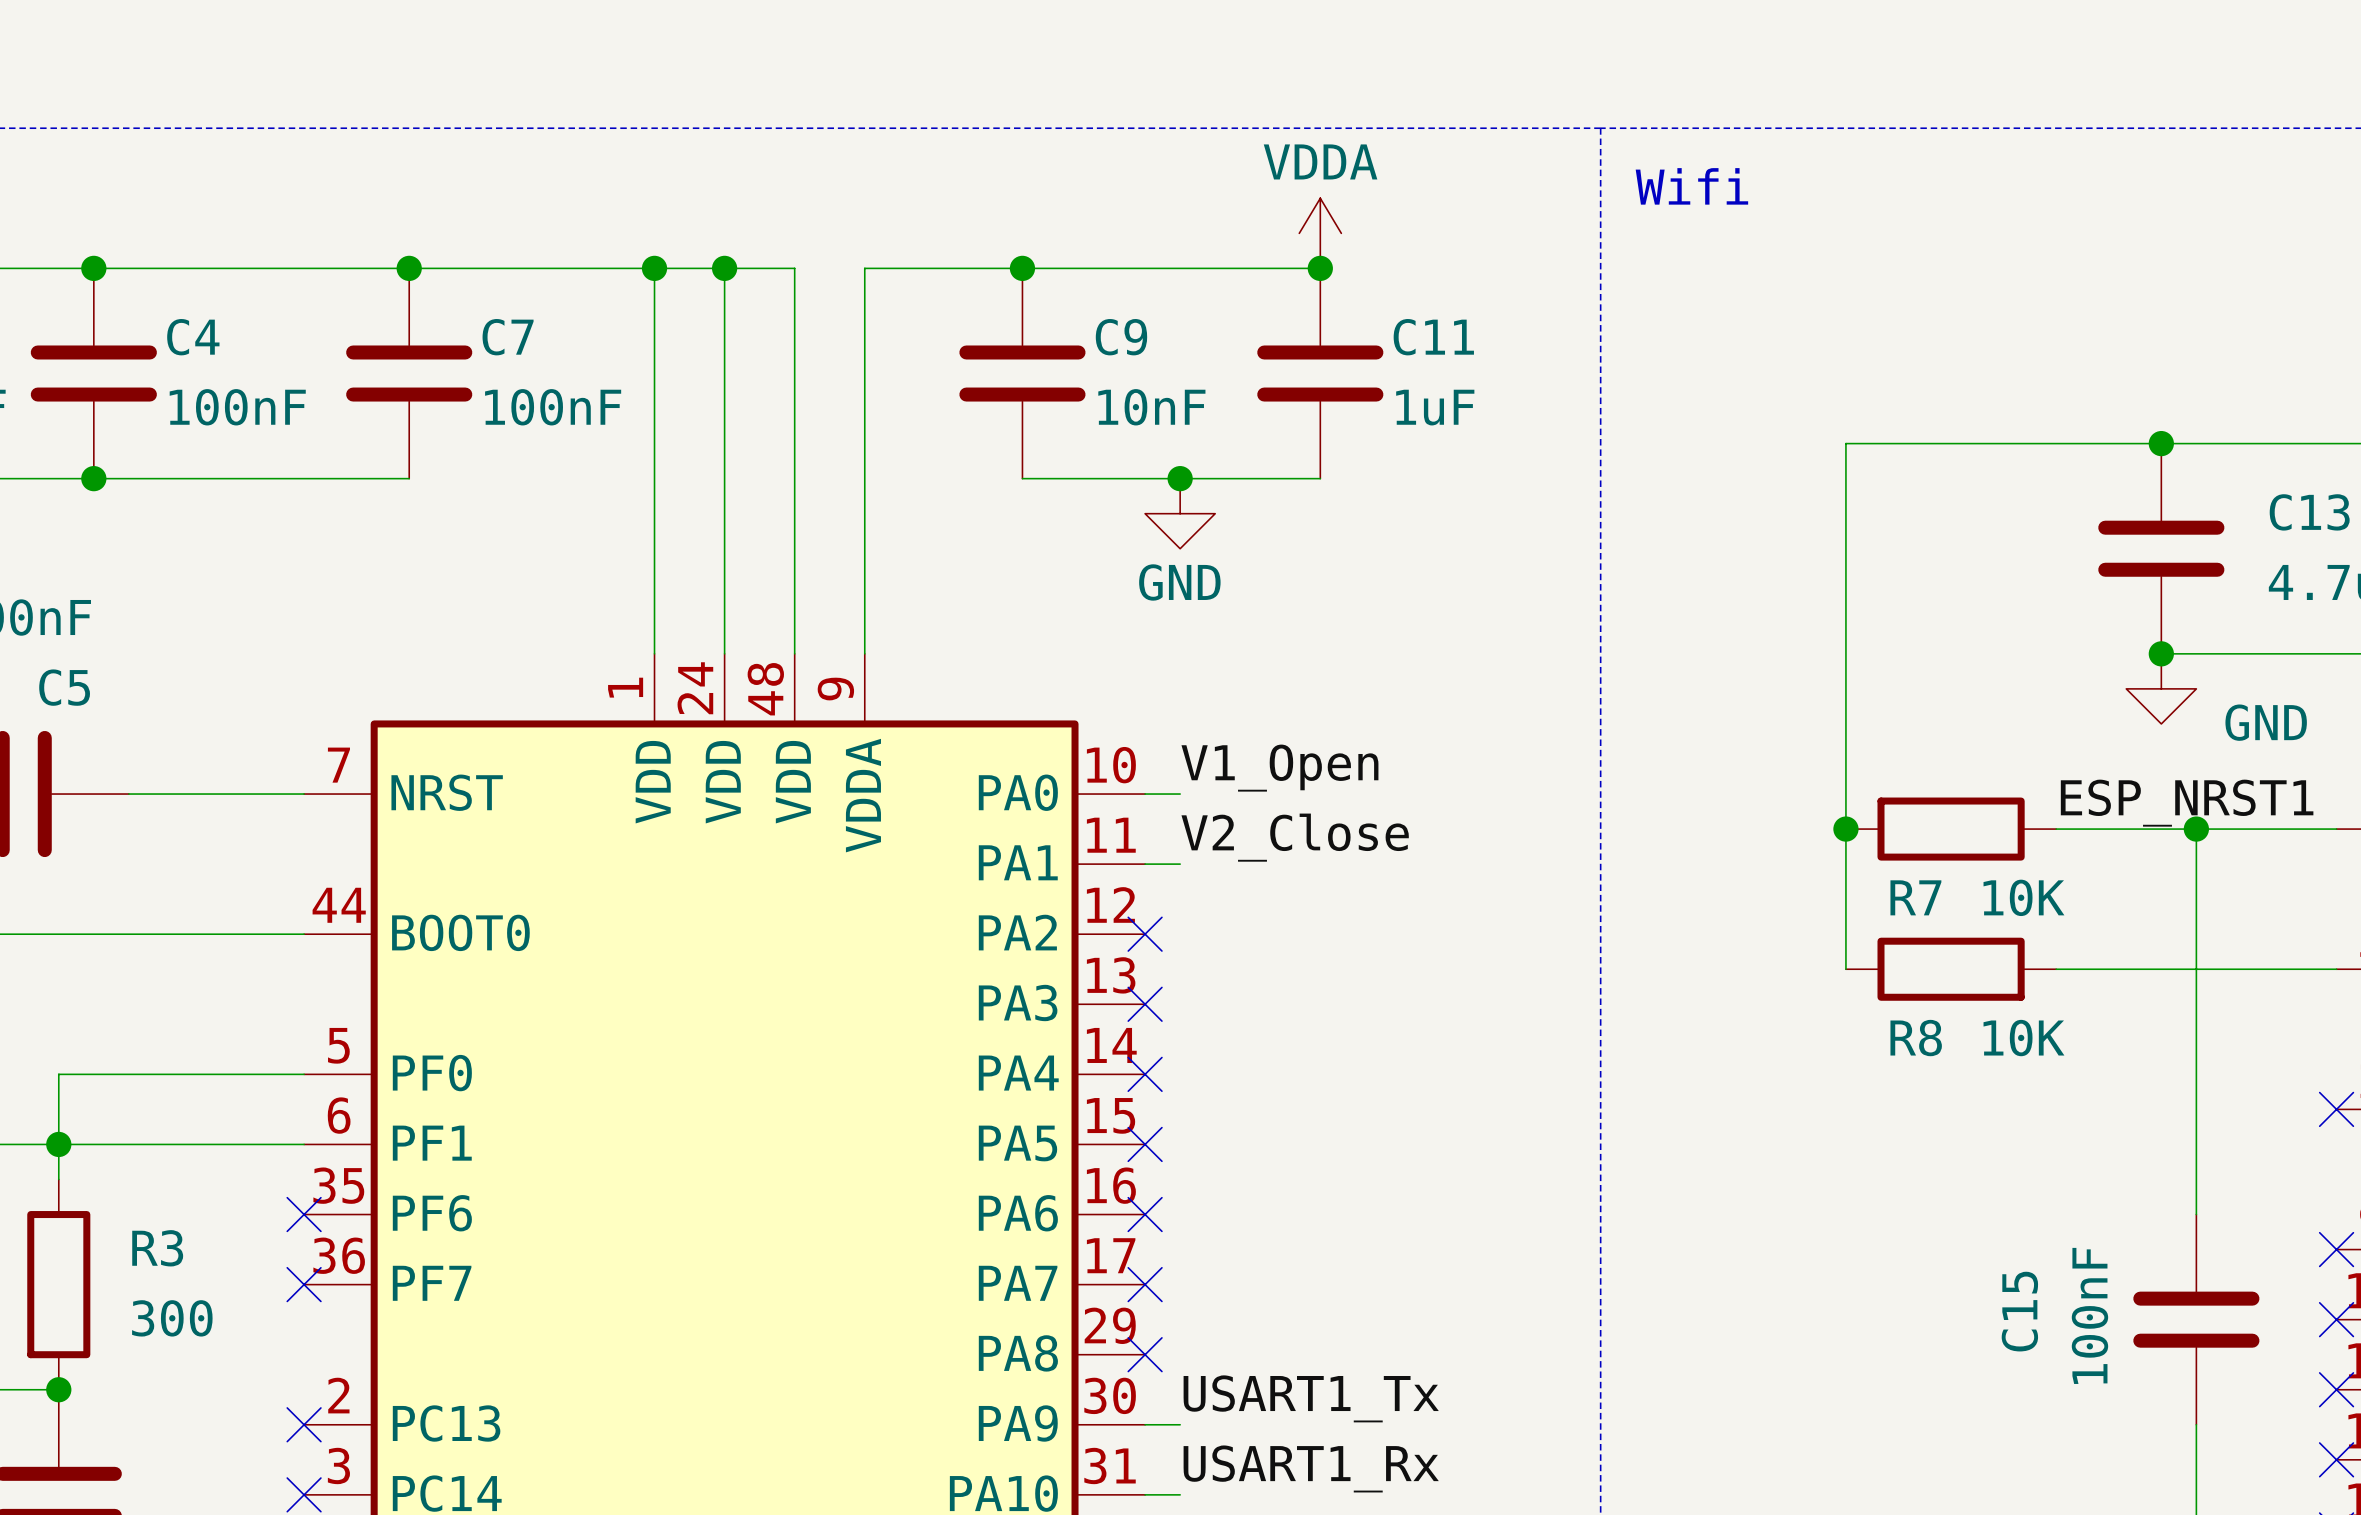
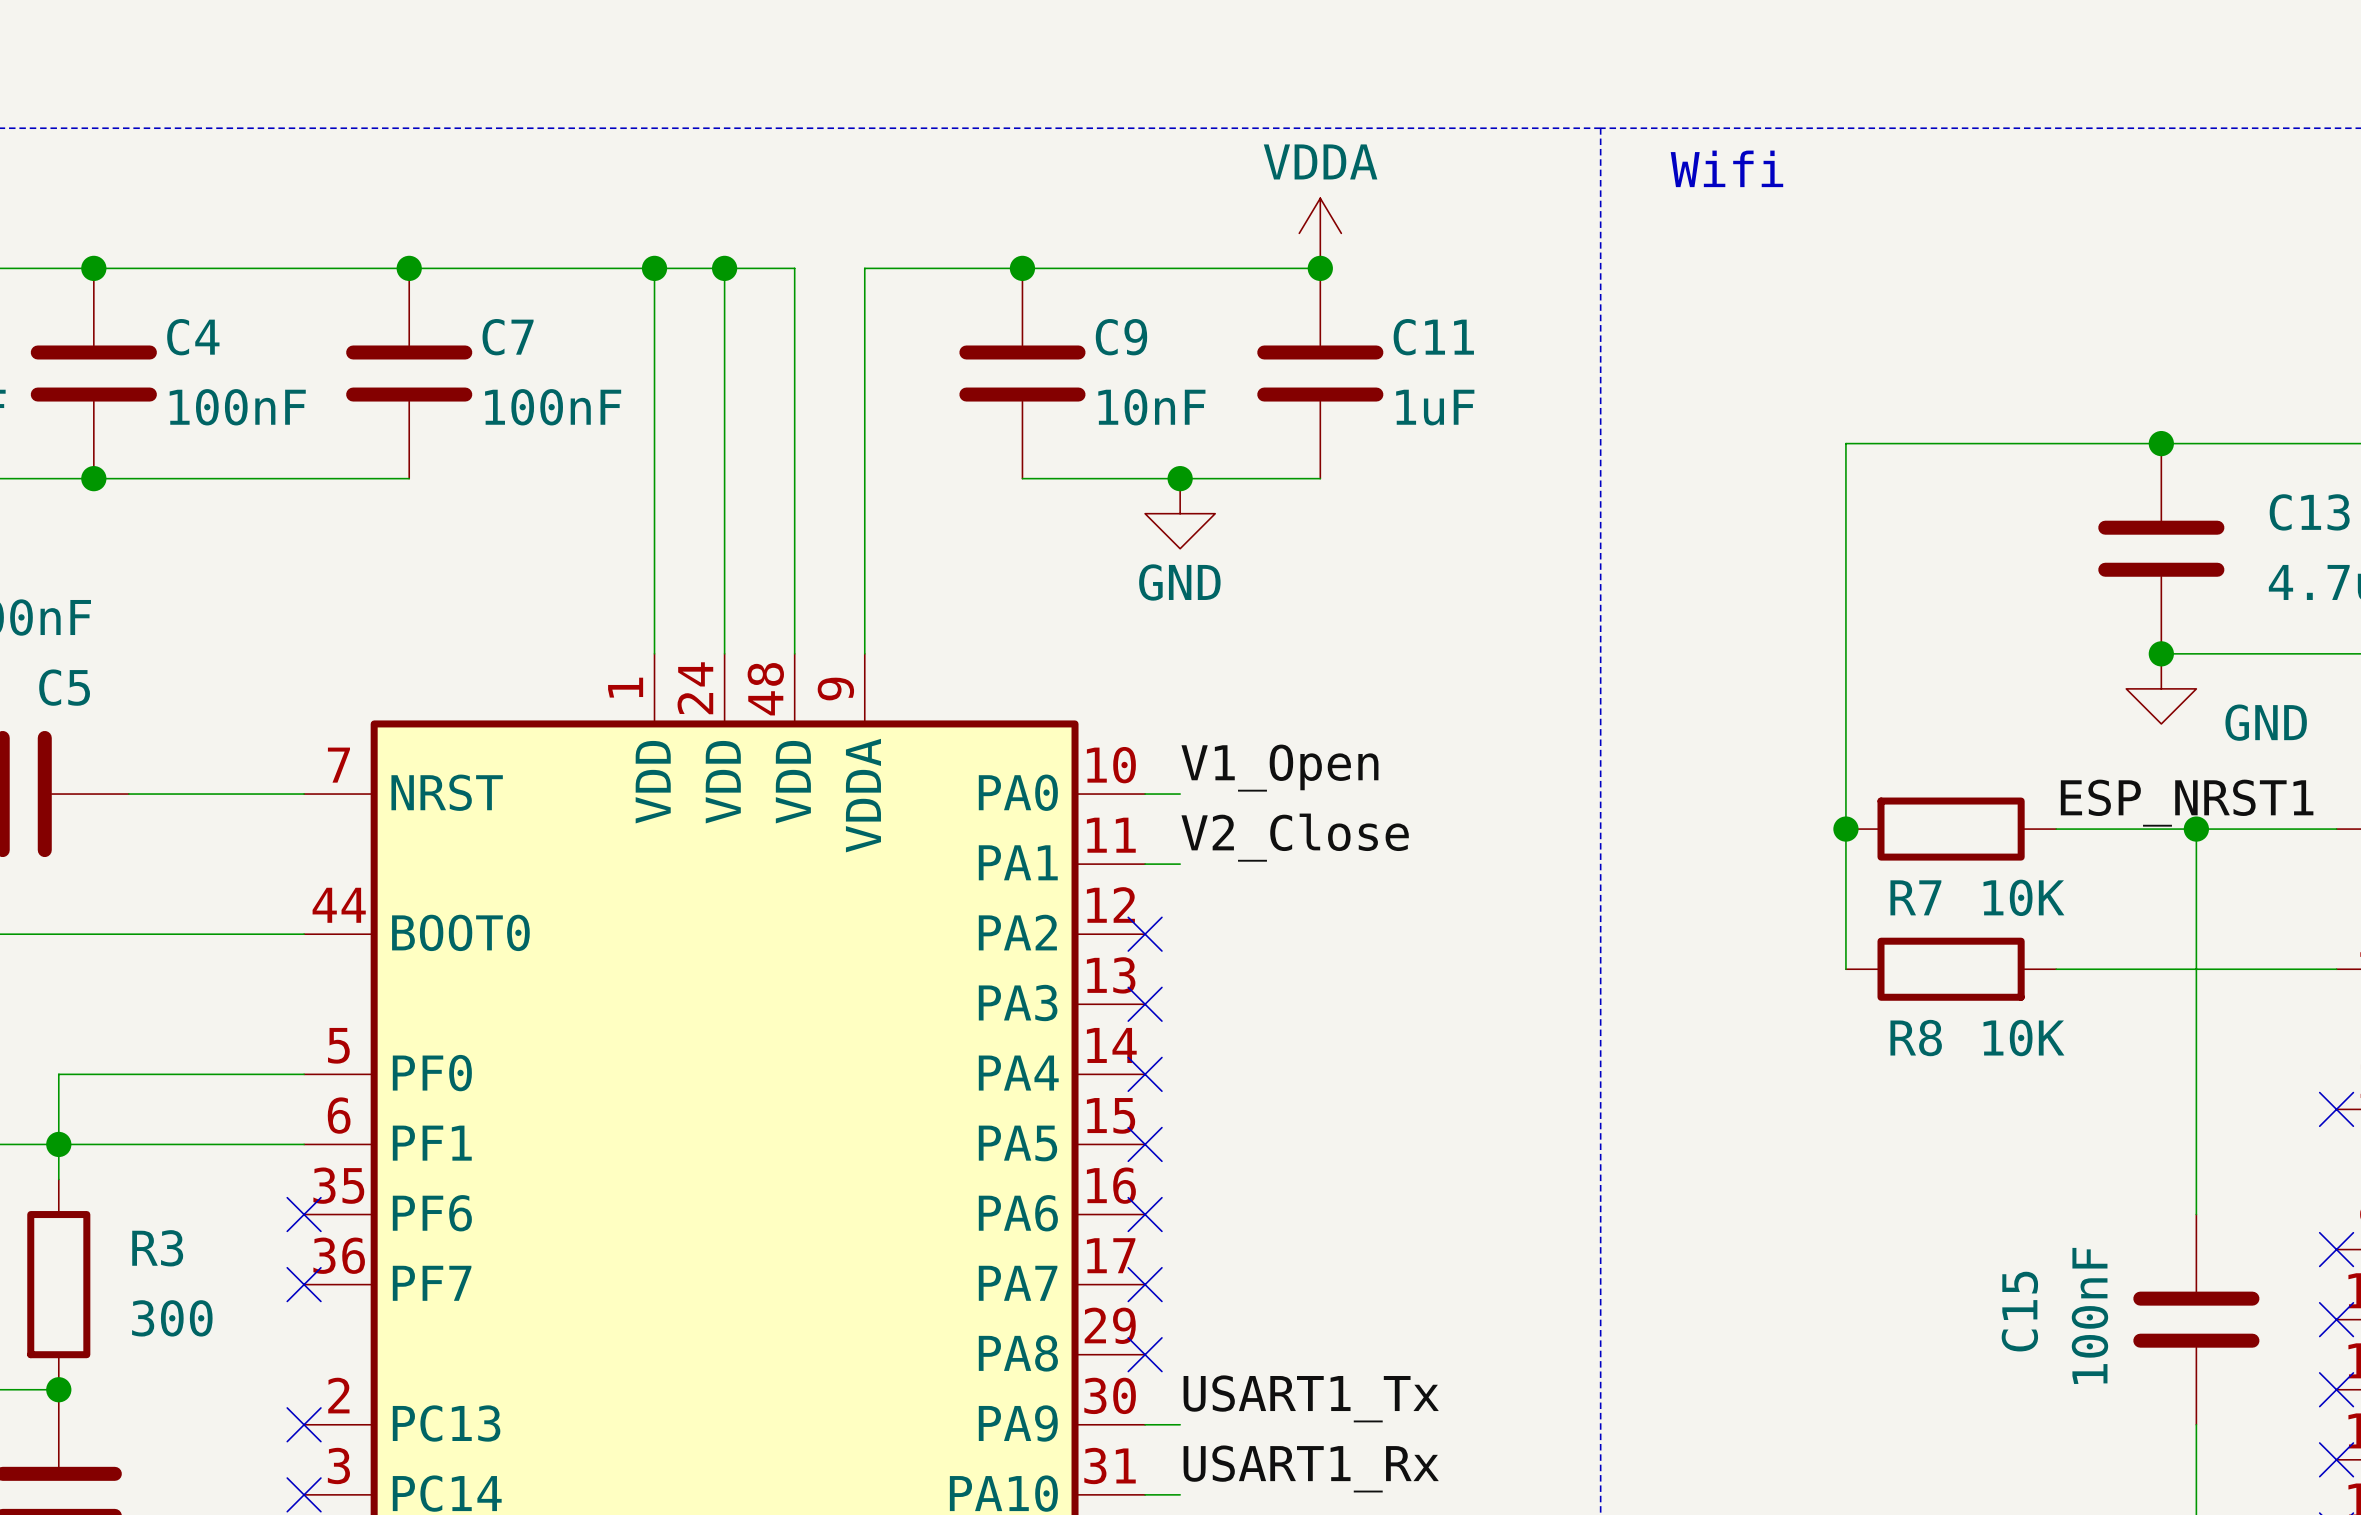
text position: Wifi (1691, 186) -> Wifi (1726, 168)

